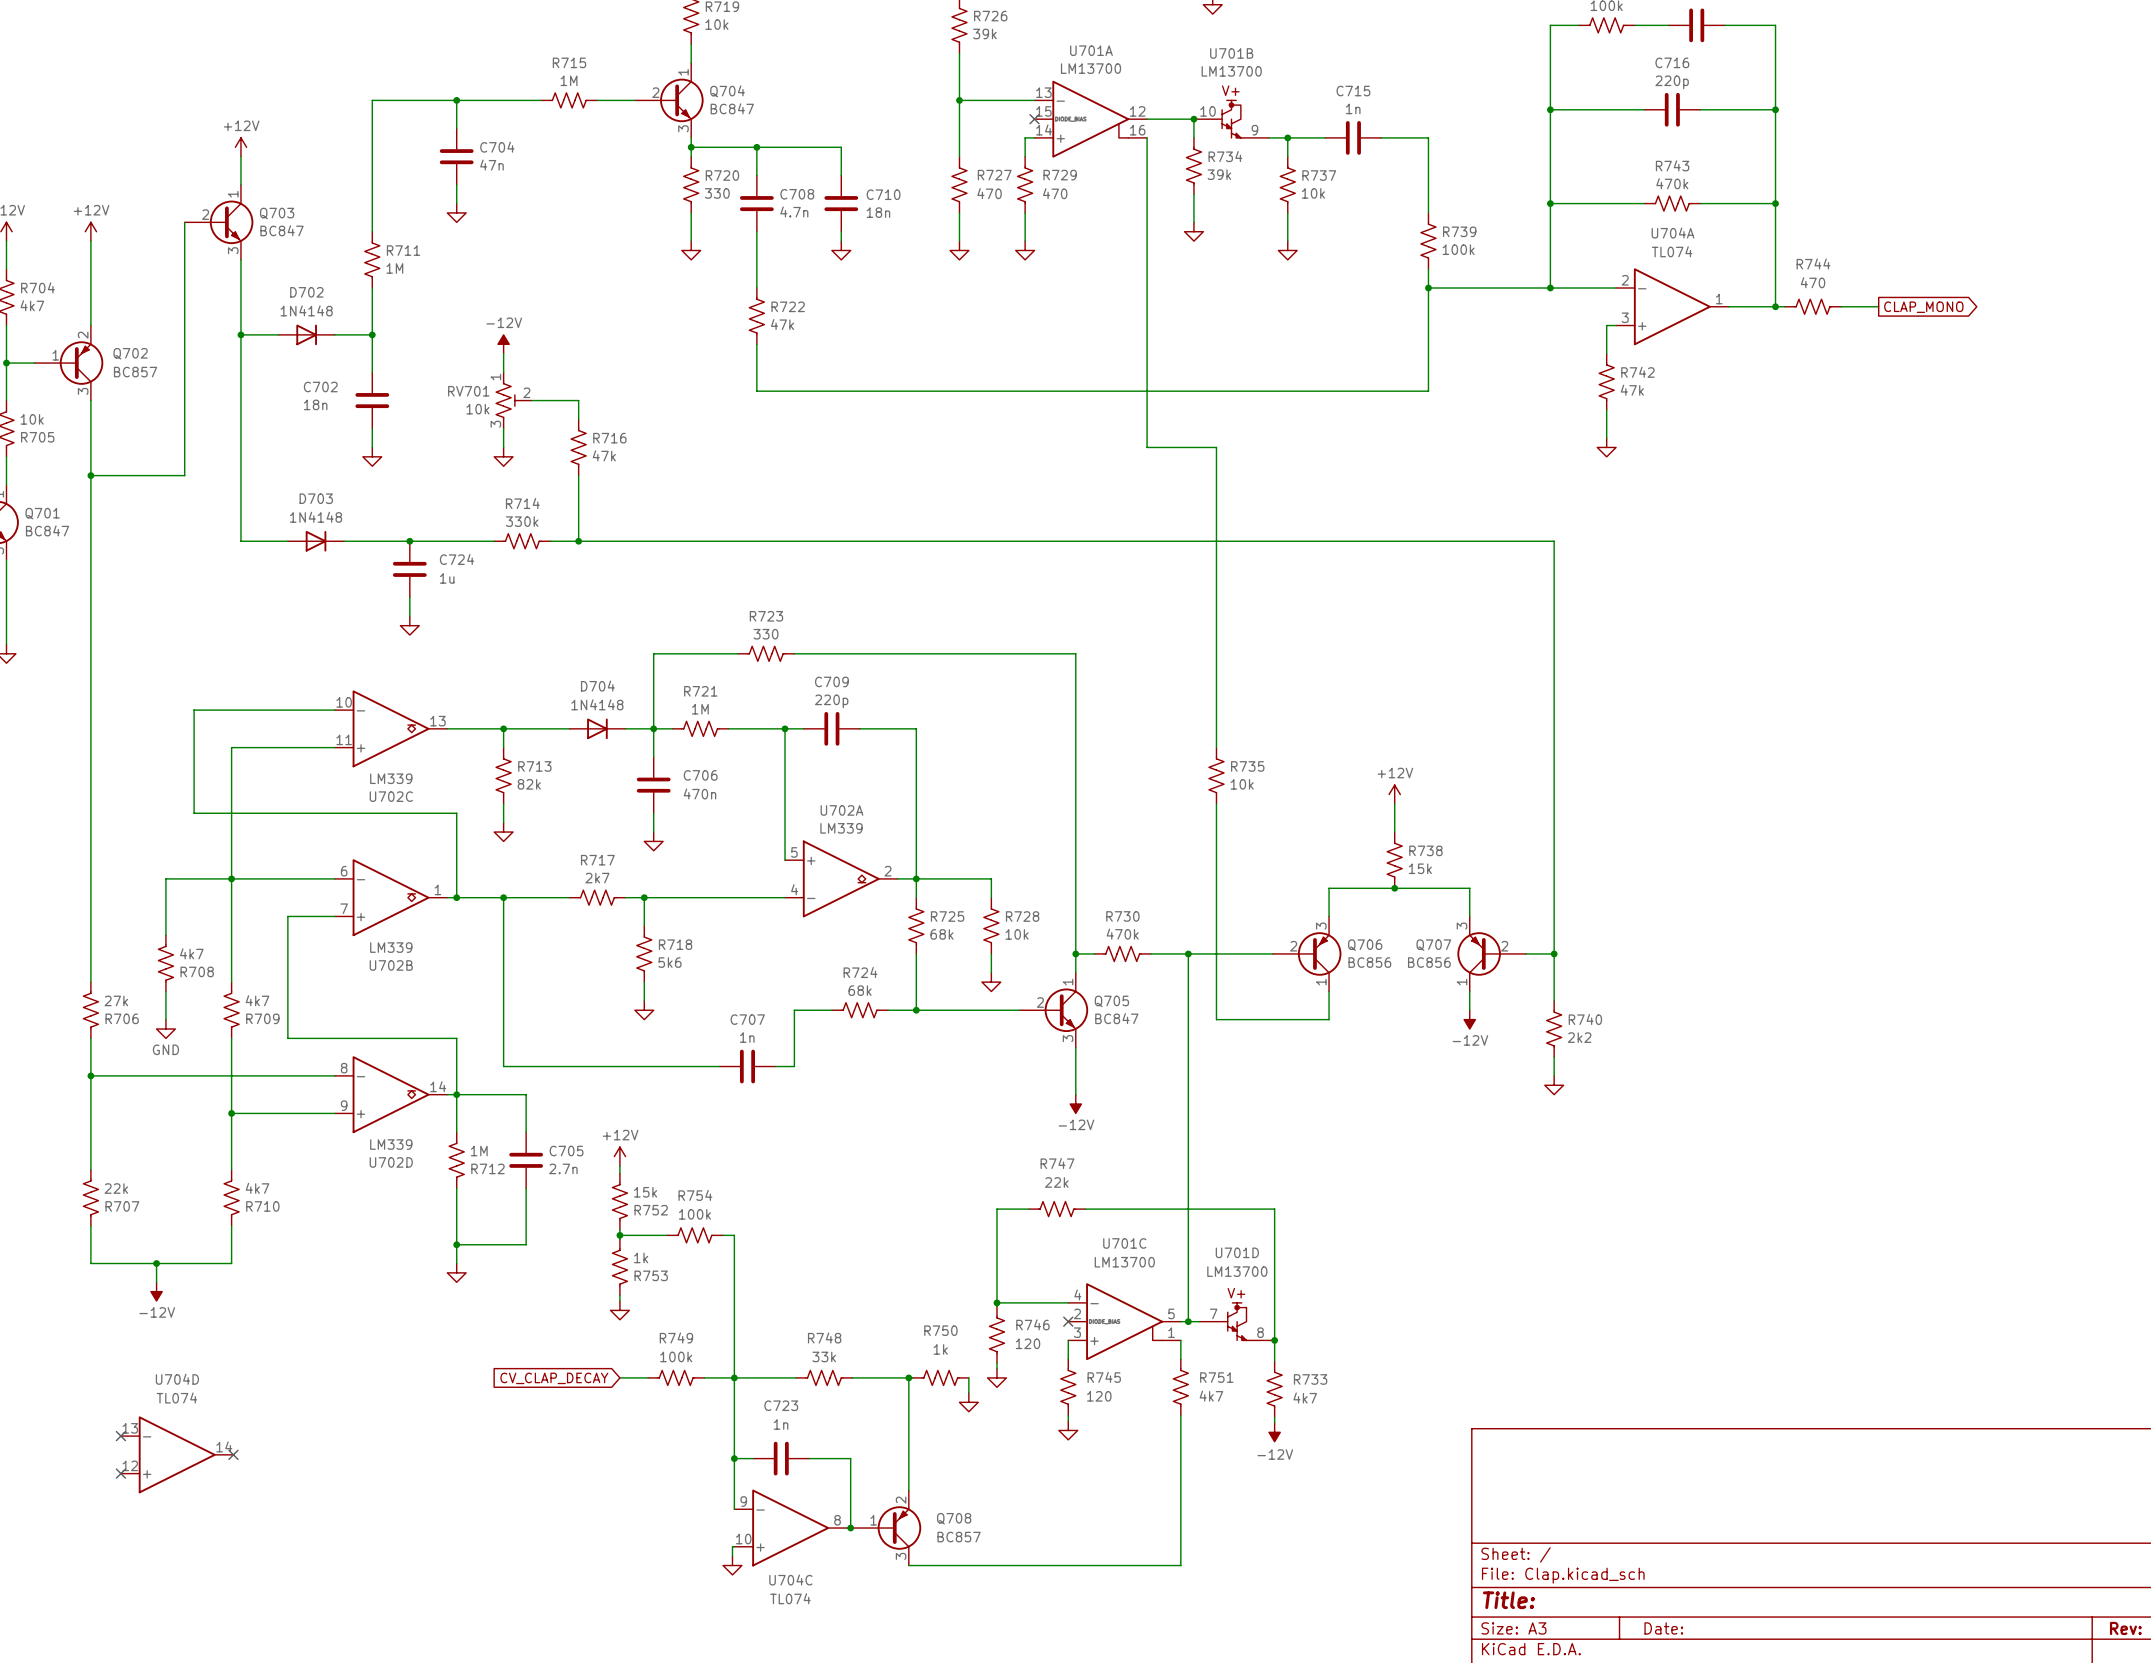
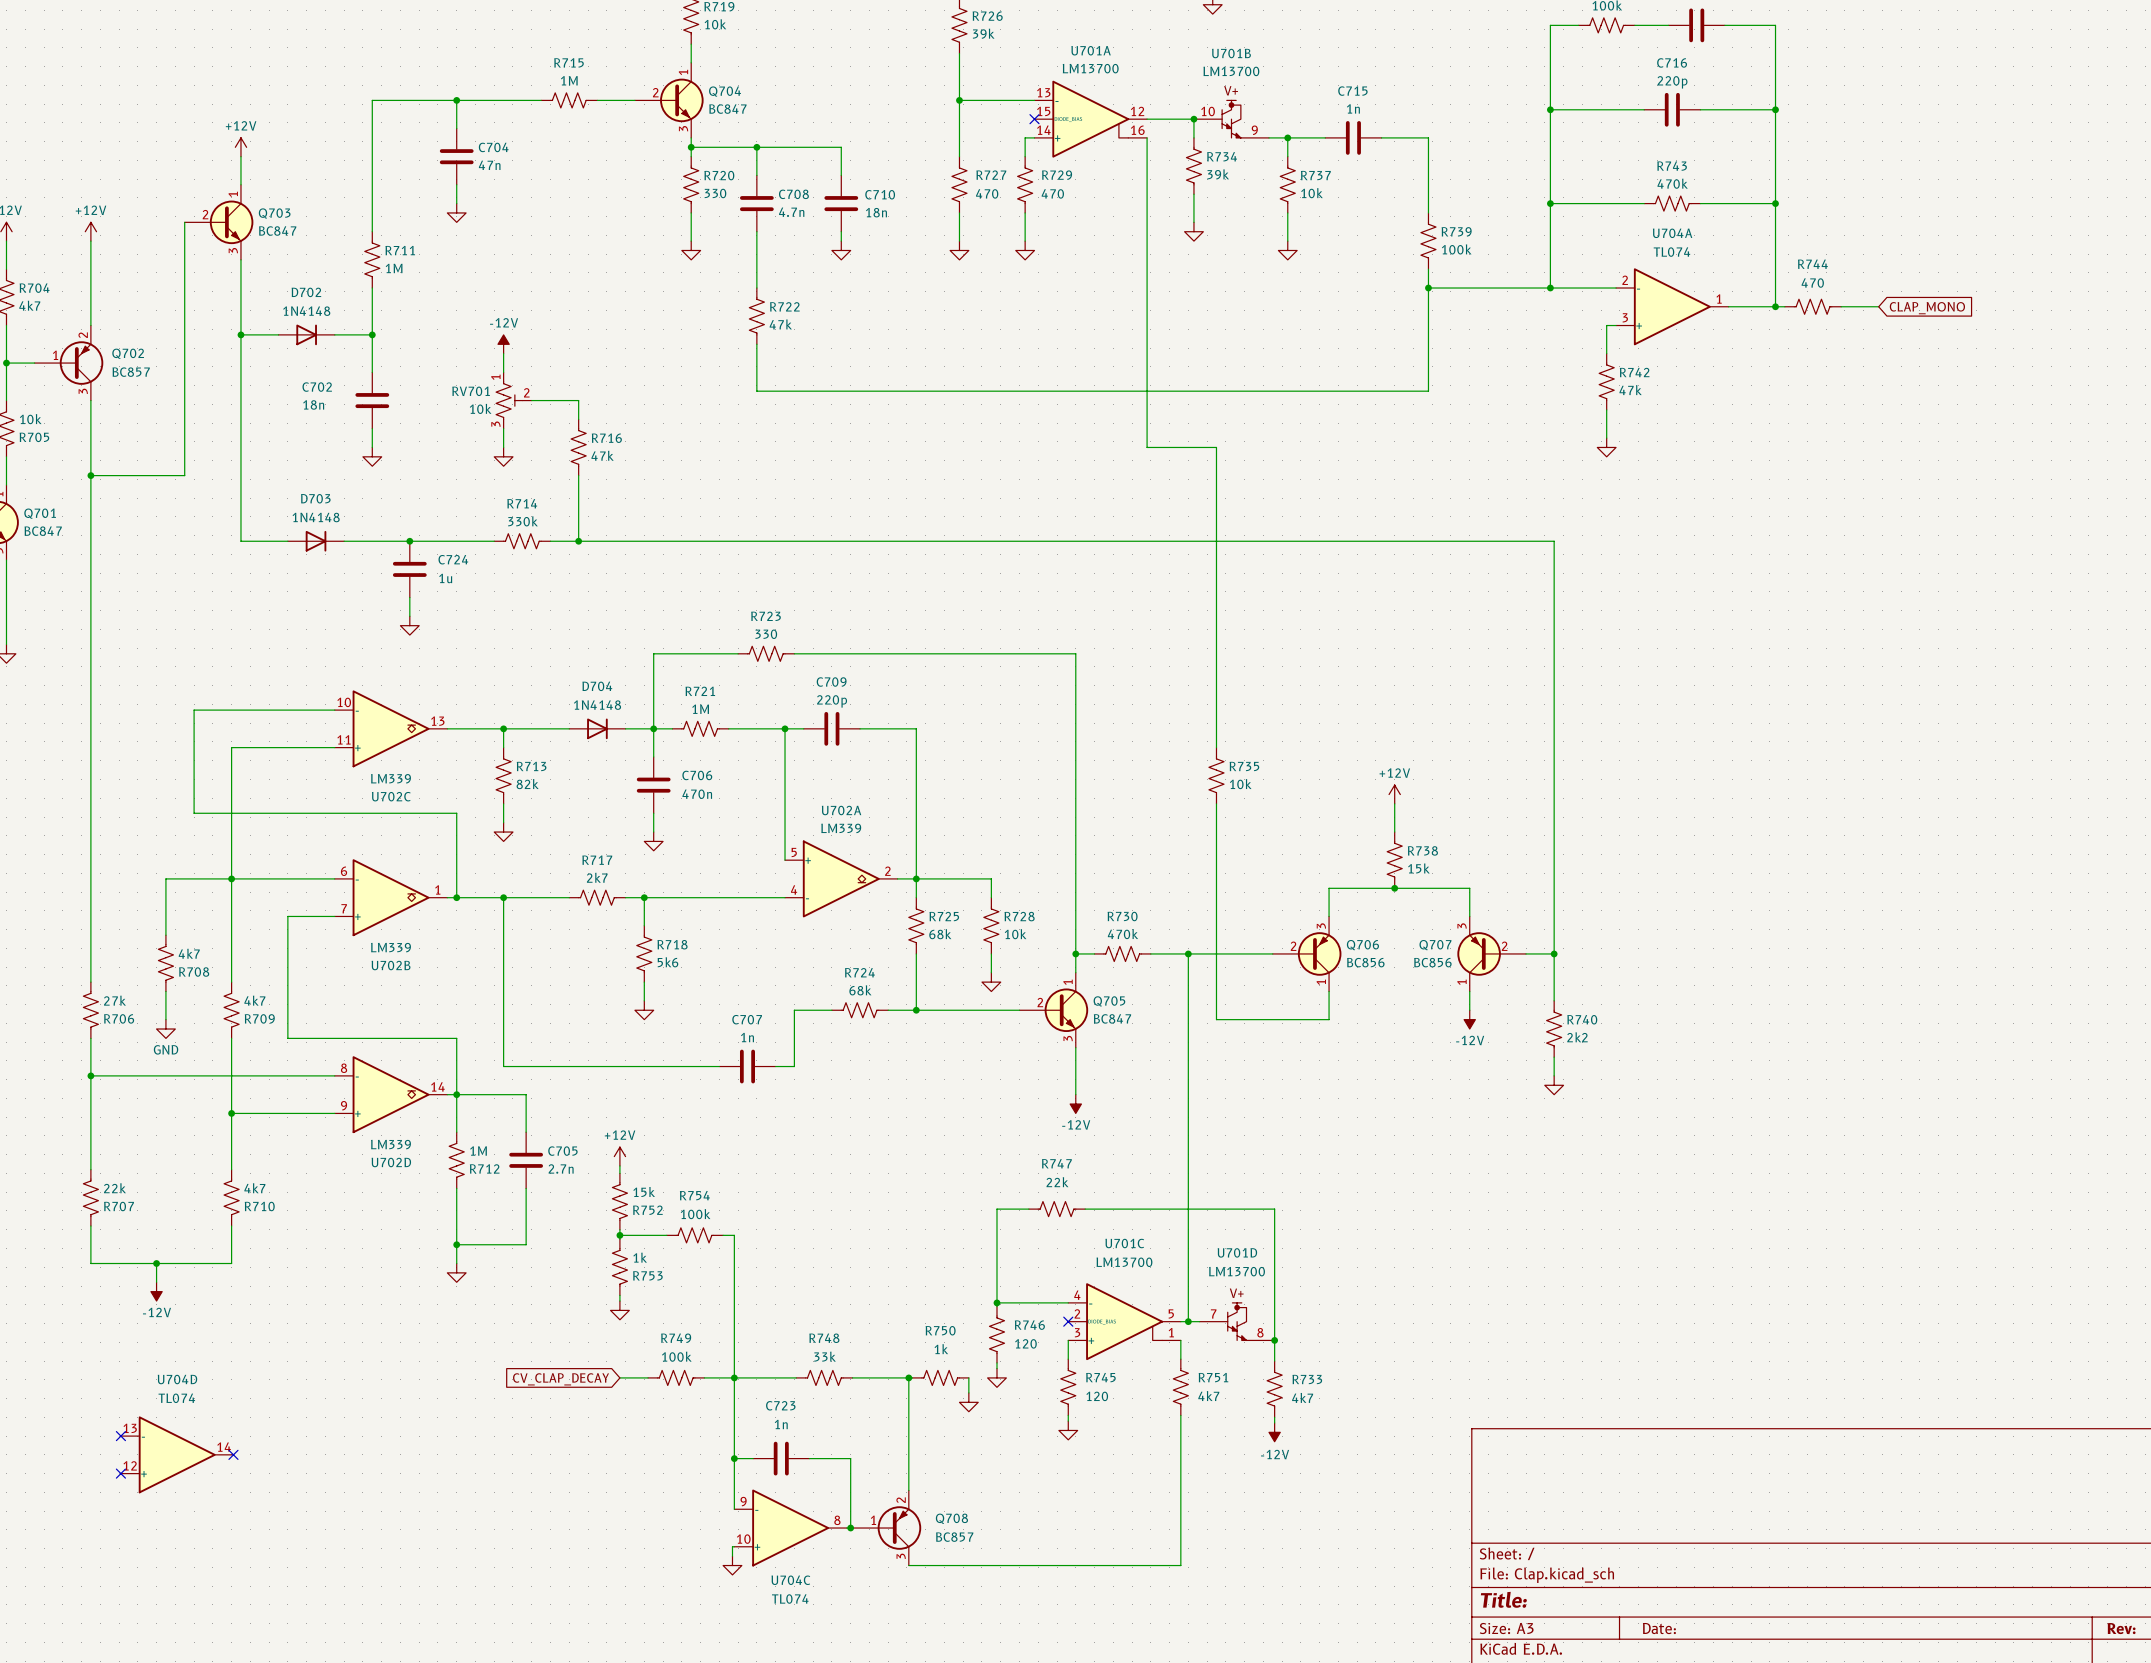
global label shape: output (1923, 307) -> input (1927, 308)

